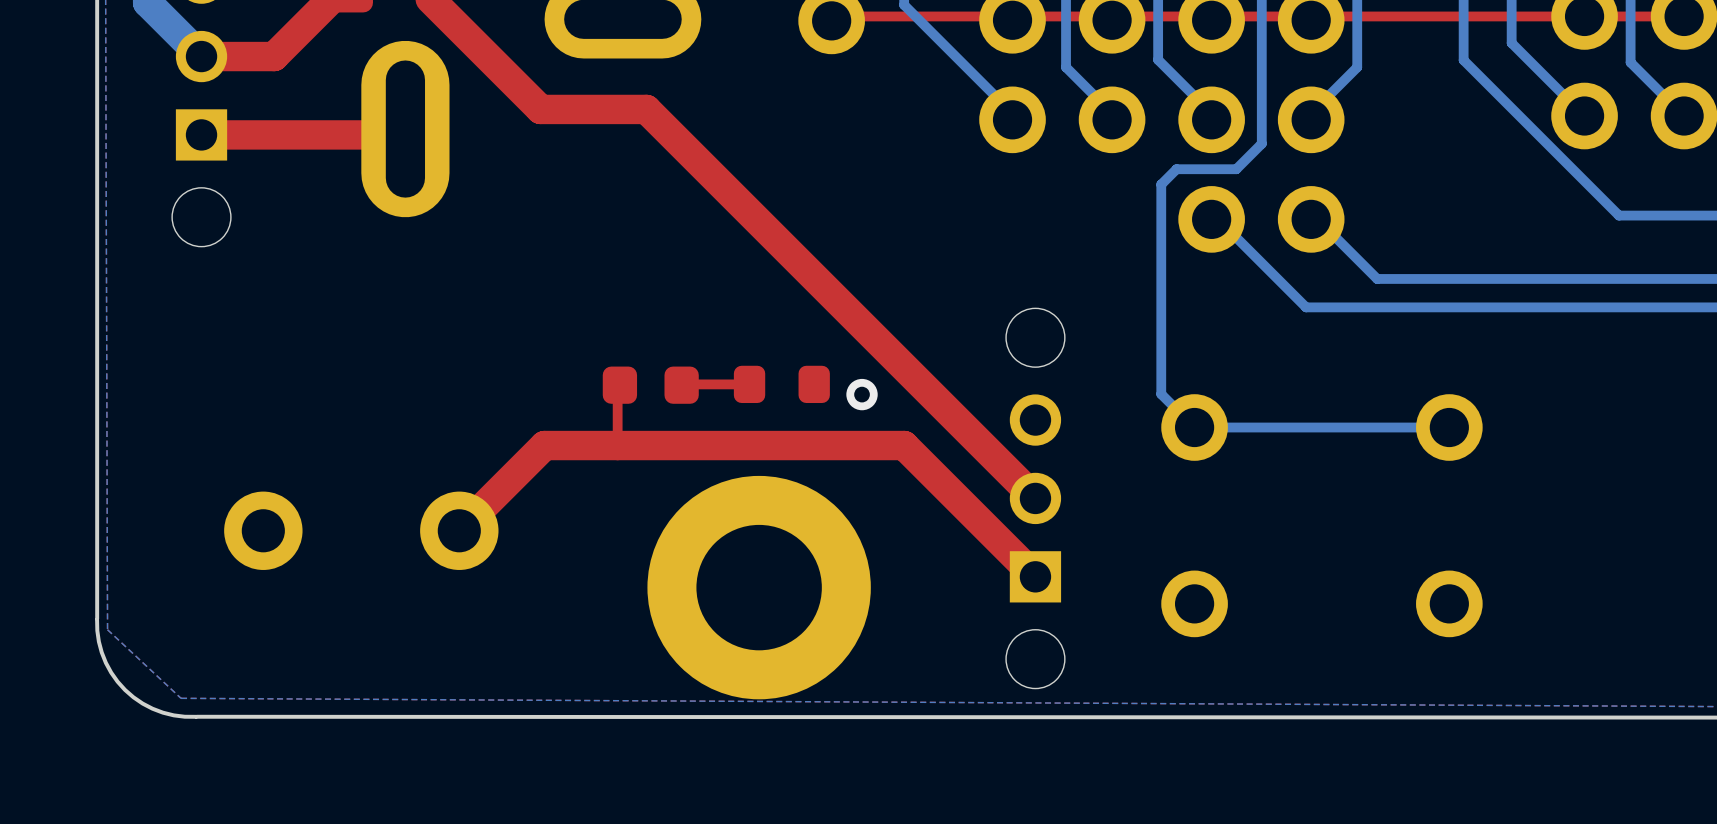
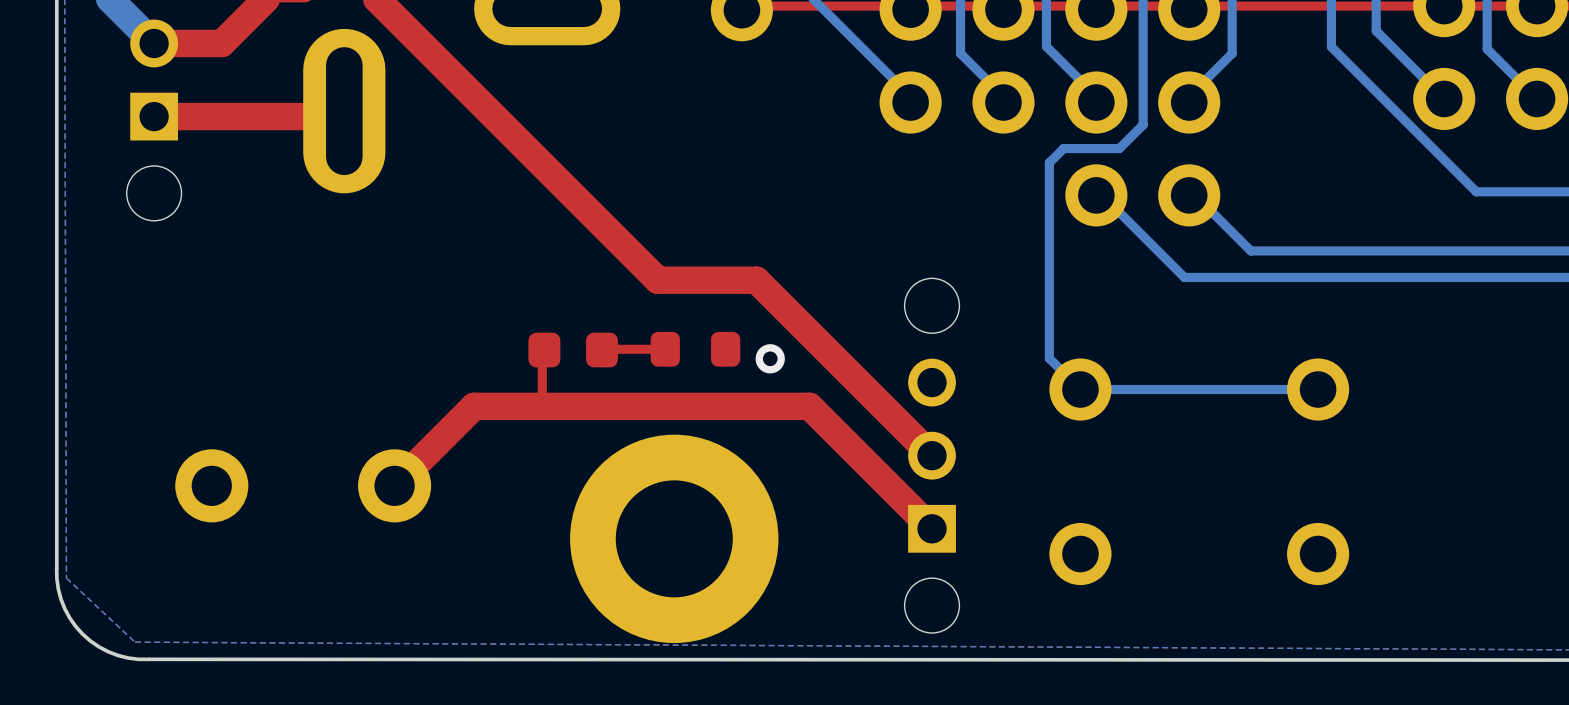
top track: (540, 109) (646, 109) (847, 310) -> (470, 92) (657, 280) (756, 280)

